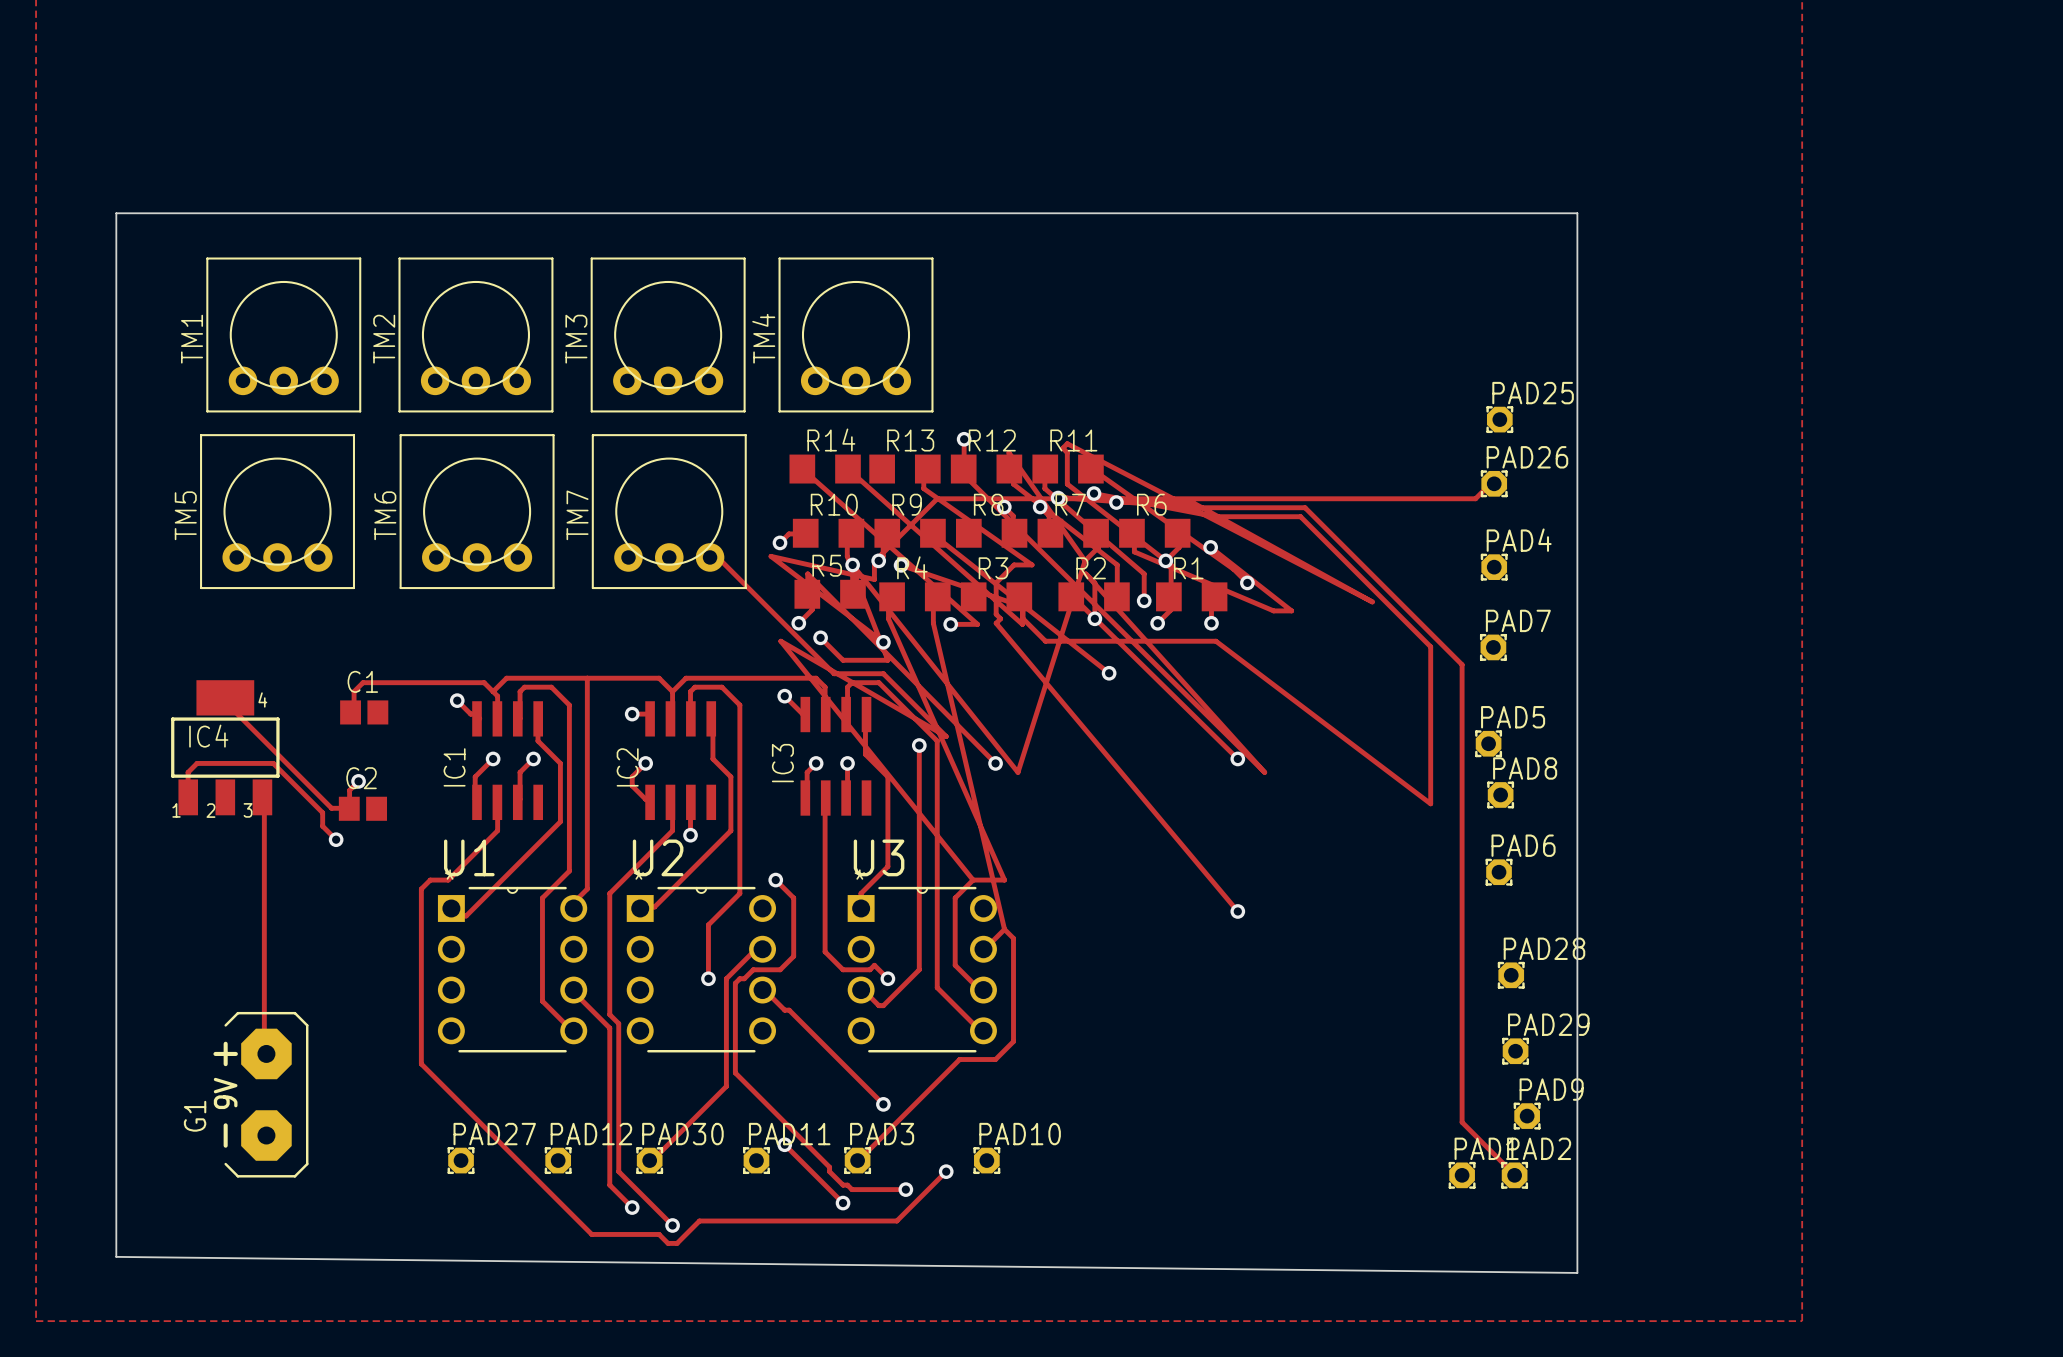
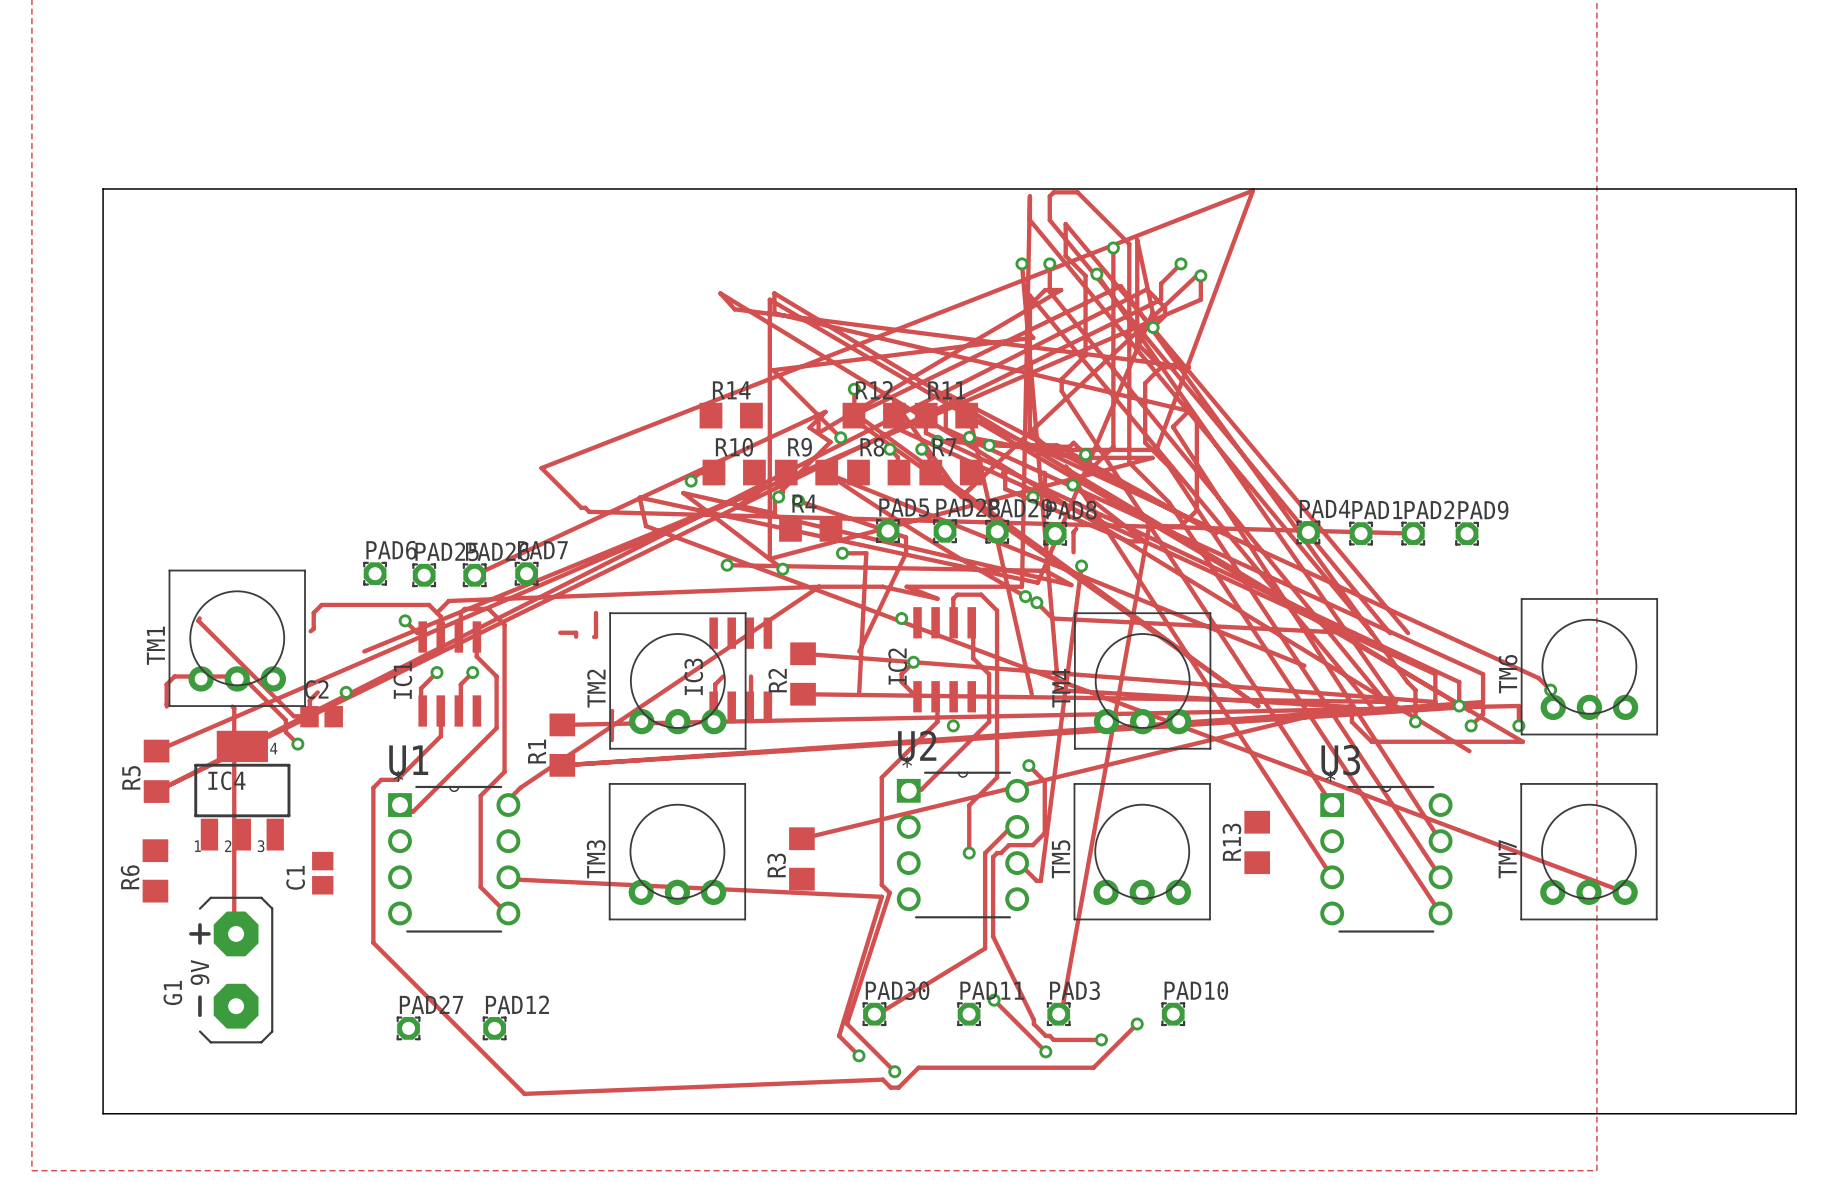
board edge: (1577, 213) (1577, 1272) (116, 1256) -> (1397, 188) (1796, 188) (1796, 1113) (103, 1113)
track: none -> (1113, 248) (1113, 446) (1081, 478) (1077, 478) (1065, 466) (1332, 877)
via: none -> (1113, 248)
track: none -> (1021, 263) (1056, 670) (1056, 690) (1353, 707)
via: none -> (1021, 263)
track: none -> (1049, 263) (1049, 291) (1390, 707)
via: none -> (1049, 263)
track: none -> (1180, 263) (1161, 283) (1161, 299) (156, 791) (1146, 289) (1165, 307) (1165, 315) (1153, 327)
via: none -> (1180, 263)
track: none -> (1096, 274) (1395, 702) (803, 694)
via: none -> (1096, 274)
via: none -> (1200, 275)
TM1 position: (283, 334) -> (237, 638)
TM2 position: (475, 334) -> (677, 680)
TM3 position: (668, 334) -> (677, 851)
TM4 position: (856, 334) -> (1142, 680)
via: none -> (1153, 327)
track: none -> (1161, 367) (1188, 367) (734, 309) (720, 293) (1469, 751)
track: none -> (1161, 367) (1145, 383) (1145, 442) (1169, 466) (1440, 877)
track: none -> (1161, 367) (1137, 343) (1137, 240) (1152, 312) (1037, 582) (639, 497) (645, 526) (1625, 892)
PAD25 position: (1499, 419) -> (424, 575)
R13 name position: R13 (910, 440) -> R13 (1231, 842)
track: none -> (1188, 410) (774, 313) (774, 293) (1469, 710)
track: none -> (1188, 410) (1173, 426) (1440, 841)
track: none -> (1188, 410) (1196, 418) (1196, 510) (1180, 526) (1149, 526) (1061, 1012) (1058, 1014)
track: (964, 466) (963, 469) (959, 470) (1264, 772) (1085, 573) (1094, 582) (1094, 618) -> (854, 413) (1258, 706) (850, 417) (1120, 286) (1407, 682) (1415, 690) (1415, 721)
track: (802, 469) (977, 624) -> (859, 691) (866, 553)
track: (848, 469) (1022, 624) -> (859, 651) (906, 553)
R13 rotation: 0° (904, 469) -> 90° clockwise (1257, 842)
R13 position: (904, 469) -> (1257, 842)
track: (1090, 469) (1233, 569) (1247, 582) -> none
track: (1494, 483) (1493, 480) (1475, 498) (937, 498) -> (474, 575) (825, 411) (809, 427) (830, 441)
PAD26 position: (1494, 483) -> (474, 575)
track: (1013, 484) (1117, 564) (1116, 596) -> (898, 428) (1435, 674) (1435, 702) (803, 653)
track: (1067, 484) (1171, 564) (1171, 596) (1168, 596) (1171, 600) (1171, 609) (1157, 623) -> (945, 428) (1483, 674) (1483, 702) (562, 765) (1483, 706) (1483, 713) (1471, 725)
track: (923, 488) (1032, 564) (1014, 564) (996, 582) (996, 614) (1000, 618) (996, 623) (1237, 911) -> (818, 432) (1061, 290) (1045, 290) (1029, 305) (1029, 333) (1033, 337) (773, 370) (840, 437)
track: (1044, 488) (1144, 573) (1144, 600) -> (925, 432) (1459, 682) (1459, 706)
via: none -> (840, 437)
R6 name position: R6 (1151, 504) -> R6 (130, 877)
track: (1305, 507) (1462, 664) (1462, 1122) (1506, 1167) (1511, 1167) (1515, 1171) (1514, 1175) -> (1156, 449) (1252, 190) (541, 468) (581, 507) (585, 507) (589, 511) (1413, 533)
TM5 position: (277, 511) -> (1142, 851)
TM6 position: (477, 511) -> (1589, 666)
TM7 position: (669, 511) -> (1588, 851)
track: none -> (1085, 454) (1073, 442) (1069, 446) (1045, 446) (1029, 430) (1029, 295) (1371, 707)
via: none -> (1085, 454)
track: (1300, 516) (1430, 646) (1430, 803) (1215, 641) (1045, 641) (1023, 618) (1023, 600) (1019, 596) -> (1152, 457) (769, 558) (769, 299) (1522, 741) (1371, 741) (1351, 721) (1351, 706) (801, 838)
track: (851, 533) (847, 533) (847, 556) (887, 660) (843, 660) (820, 637) -> (364, 651) (765, 487) (736, 507) (1071, 585) (1045, 570) (727, 565)
track: (932, 533) (1109, 673) -> none
R6 rotation: 0° (1154, 533) -> 90° clockwise (155, 870)
R6 position: (1154, 533) -> (155, 870)
track: (710, 557) (712, 561) (721, 561) (834, 673) (883, 673) (946, 736) (780, 641) (973, 880) -> none
track: (1085, 560) (1017, 772) (852, 564) (852, 594) -> (961, 496) (1200, 271) (1200, 299) (156, 751)
via: (852, 564) -> none
R5 name position: R5 (827, 565) -> R5 (131, 777)
PAD4 position: (1494, 567) -> (1308, 532)
R3 name position: R3 (993, 568) -> R3 (776, 865)
R2 name position: R2 (1091, 568) -> R2 (777, 680)
R1 name position: R1 (1188, 568) -> R1 (537, 751)
via: (1247, 582) -> none
R5 rotation: 0° (830, 594) -> 90° clockwise (156, 771)
R5 position: (830, 594) -> (156, 771)
track: (892, 596) (888, 600) (888, 618) (1004, 880) (973, 880) -> none
track: (937, 596) (933, 600) (933, 623) (1004, 929) -> none
R3 rotation: 0° (996, 596) -> 90° clockwise (801, 858)
R3 position: (996, 596) -> (801, 858)
track: (1071, 596) (1237, 758) -> none
R2 rotation: 0° (1094, 596) -> 90° clockwise (803, 674)
R2 position: (1094, 596) -> (803, 674)
R1 rotation: 0° (1191, 596) -> 90° clockwise (562, 745)
R1 position: (1191, 596) -> (562, 745)
via: (1144, 600) -> none
via: (1094, 618) -> none
track: (798, 623) (812, 609) (812, 600) (807, 594) (807, 573) (995, 763) -> none
via: (798, 623) -> none
via: (1157, 623) -> none
via position: (1211, 623) -> (1081, 566)
track: none -> (1081, 566) (1040, 880) (1036, 880) (1017, 863)
PAD7 position: (1493, 647) -> (526, 573)
track: none -> (819, 586) (882, 586) (937, 598) (906, 586) (1021, 586) (1029, 196) (1029, 220) (1371, 633)
via: (1109, 673) -> none
track: none -> (1025, 596) (924, 537) (826, 473) (1304, 665)
via: none -> (1025, 596)
track: (506, 678) (659, 678) (672, 691) (686, 678) (816, 678) (825, 687) (825, 714) -> (448, 600) (819, 586)
track: (587, 678) (587, 889) -> (819, 586) (520, 787)
track: none -> (1036, 602) (1052, 618) (1353, 633)
via: none -> (1036, 602)
C1 name position: C1 (362, 681) -> C1 (295, 877)
track: (784, 696) (805, 714) -> none
via: (784, 696) -> none
via: none -> (901, 618)
C1 rotation: 0° (364, 712) -> 90° clockwise (322, 873)
C1 position: (364, 712) -> (322, 873)
via: (632, 714) -> none
track: (846, 714) (847, 687) (852, 682) (878, 682) (937, 741) (937, 987) (982, 1032) (983, 1030) -> none
track: (866, 714) (865, 754) (887, 776) (887, 866) (860, 893) (861, 908) -> none
track: none -> (1390, 633) (1049, 220) (1049, 196) (1053, 192) (1077, 192) (1129, 244) (1129, 462) (1169, 502) (1440, 913)
track: none -> (1408, 633) (1065, 224) (1065, 255) (1085, 275) (1085, 355) (1061, 379) (1061, 391) (1332, 805)
track: (690, 718) (690, 691) (695, 687) (721, 687) (739, 705) (739, 893) (708, 924) (708, 978) -> (953, 622) (953, 598) (957, 594) (981, 594) (997, 610) (997, 777) (969, 805) (969, 853)
track: (711, 718) (712, 723) (712, 758) (730, 776) (730, 830) (654, 906) (640, 908) -> (971, 622) (973, 658) (989, 674) (989, 721) (921, 789) (908, 790)
PAD5 position: (1488, 743) -> (887, 531)
track: (919, 745) (919, 969) (883, 1005) (878, 1005) (861, 990) -> none
via: (919, 745) -> none
IC4 position: (225, 747) -> (242, 790)
via: none -> (913, 662)
via: (1237, 758) -> none
IC2 position: (680, 760) -> (944, 659)
track: (645, 763) (632, 776) (632, 785) (650, 802) -> (913, 662) (901, 674) (901, 682) (917, 696)
via: (645, 763) -> none
via: (816, 763) -> none
via: (847, 763) -> none
via: (995, 763) -> none
track: none -> (1550, 690) (1538, 678) (969, 417) (1031, 694)
via: none -> (1550, 690)
via position: (358, 781) -> (346, 692)
track: none -> (935, 696) (937, 698) (937, 721) (881, 777) (881, 884) (889, 892) (847, 1024) (894, 1071)
PAD8 position: (1500, 794) -> (1055, 533)
via: none -> (1459, 706)
track: (825, 798) (825, 951) (843, 969) (869, 969) (874, 965) (887, 978) -> none
track: (670, 802) (672, 803) (672, 830) (609, 893) (609, 1014) (618, 1023) (618, 1171) (672, 1225) -> none
via: none -> (1415, 721)
track: none -> (562, 724) (1518, 706) (1518, 725)
via: none -> (953, 725)
via: none -> (1471, 725)
via: none -> (1518, 725)
via: (690, 835) -> none
track: none -> (1028, 765) (1044, 781) (1044, 833) (1032, 845) (1008, 845) (1001, 853) (997, 853) (993, 857) (993, 936) (1033, 1020) (1033, 1024) (1045, 1035) (1049, 1035) (1053, 1039) (1101, 1039)
via: none -> (1028, 765)
PAD6 position: (1499, 872) -> (375, 573)
track: (775, 880) (793, 898) (793, 956) (780, 969) (753, 969) (744, 978) (739, 978) (735, 983) (735, 1072) (829, 1167) (829, 1171) (843, 1185) (847, 1185) (852, 1189) (905, 1189) -> none
via: (775, 880) -> none
track: (973, 880) (955, 898) (955, 965) (982, 992) (983, 990) -> none
via: (1237, 911) -> none
track: (1004, 929) (983, 949) -> none
track: (1004, 929) (1013, 938) (1013, 1041) (995, 1059) (959, 1059) (857, 1160) -> none
track: none -> (1017, 826) (1016, 829) (1008, 829) (985, 853) (985, 948) (874, 1016) (874, 1014)
track: (762, 949) (762, 951) (753, 951) (726, 978) (726, 1086) (650, 1162) (649, 1160) -> none
via: none -> (969, 853)
U2 position: (701, 969) -> (962, 845)
U3 position: (922, 969) -> (1386, 859)
PAD28 position: (1511, 975) -> (945, 531)
via: (708, 978) -> none
via: (887, 978) -> none
track: (762, 990) (784, 1010) (789, 1010) (883, 1104) -> none
track: (573, 992) (609, 1028) (609, 1185) (632, 1207) -> (508, 879) (881, 896) (839, 1035) (858, 1055)
PAD29 position: (1515, 1051) -> (997, 531)
via: (883, 1104) -> none
PAD9 position: (1527, 1116) -> (1467, 533)
via: none -> (994, 1000)
track: (784, 1144) (843, 1203) -> (994, 1000) (1045, 1051)
via: (784, 1144) -> none
via: none -> (1137, 1024)
PAD30 position: (649, 1160) -> (874, 1014)
PAD11 position: (756, 1160) -> (969, 1014)
PAD3 position: (857, 1160) -> (1058, 1014)
PAD10 position: (986, 1160) -> (1173, 1014)
track: (946, 1171) (896, 1221) (699, 1221) (677, 1243) (668, 1243) (659, 1234) (591, 1234) -> (1137, 1024) (1093, 1067) (918, 1067) (898, 1087) (890, 1087) (882, 1079) (524, 1093)
via position: (946, 1171) -> (858, 1055)
via: none -> (1101, 1039)
PAD1 position: (1462, 1175) -> (1361, 533)
PAD2 position: (1514, 1175) -> (1413, 533)
via: none -> (1045, 1051)
via: (905, 1189) -> none
via: (843, 1203) -> none
via: (632, 1207) -> none
via: none -> (894, 1071)
via: (672, 1225) -> none

